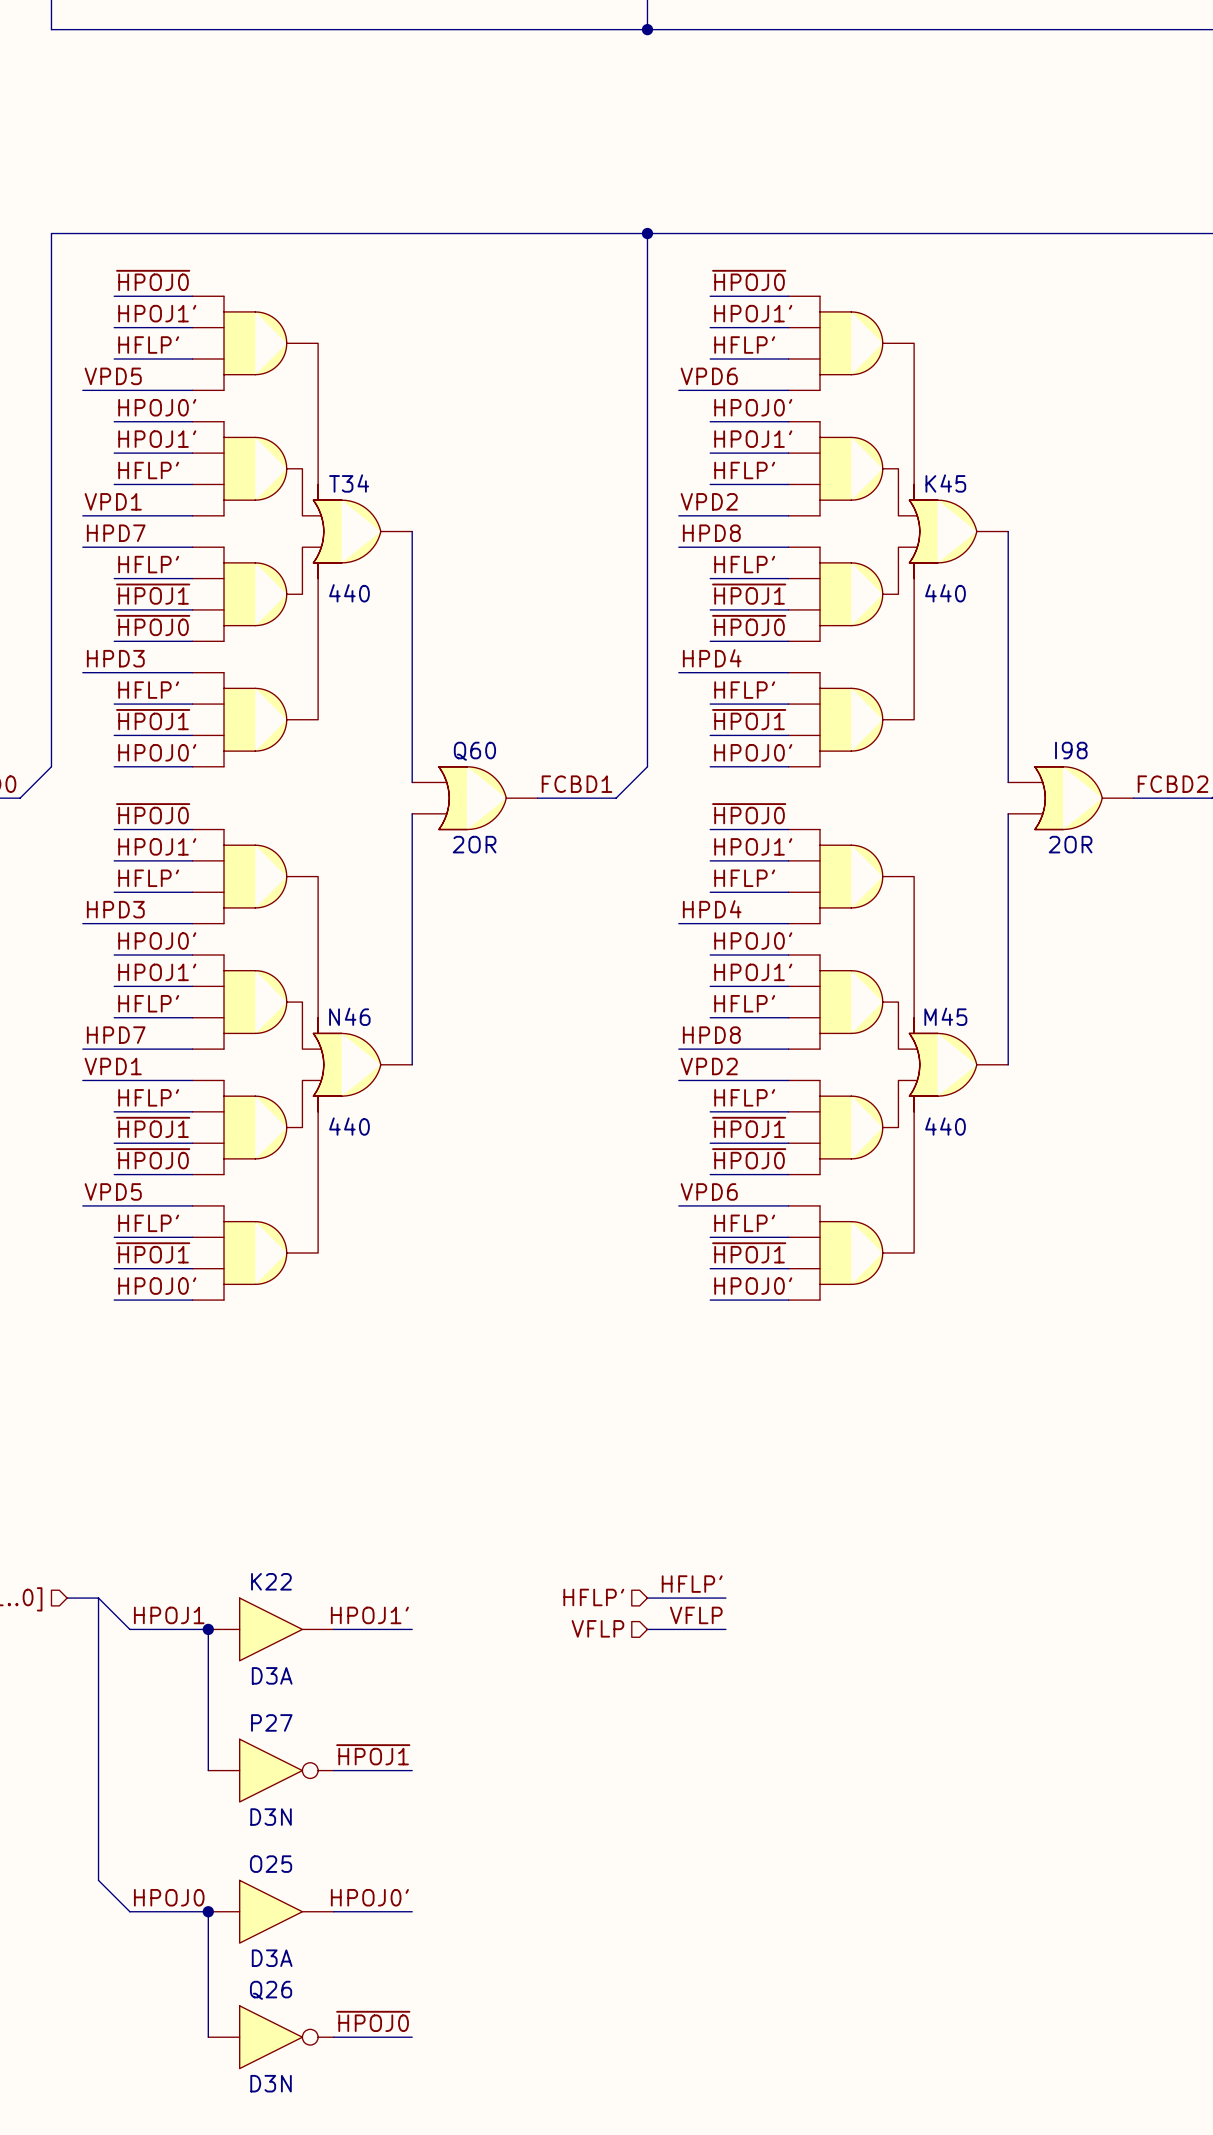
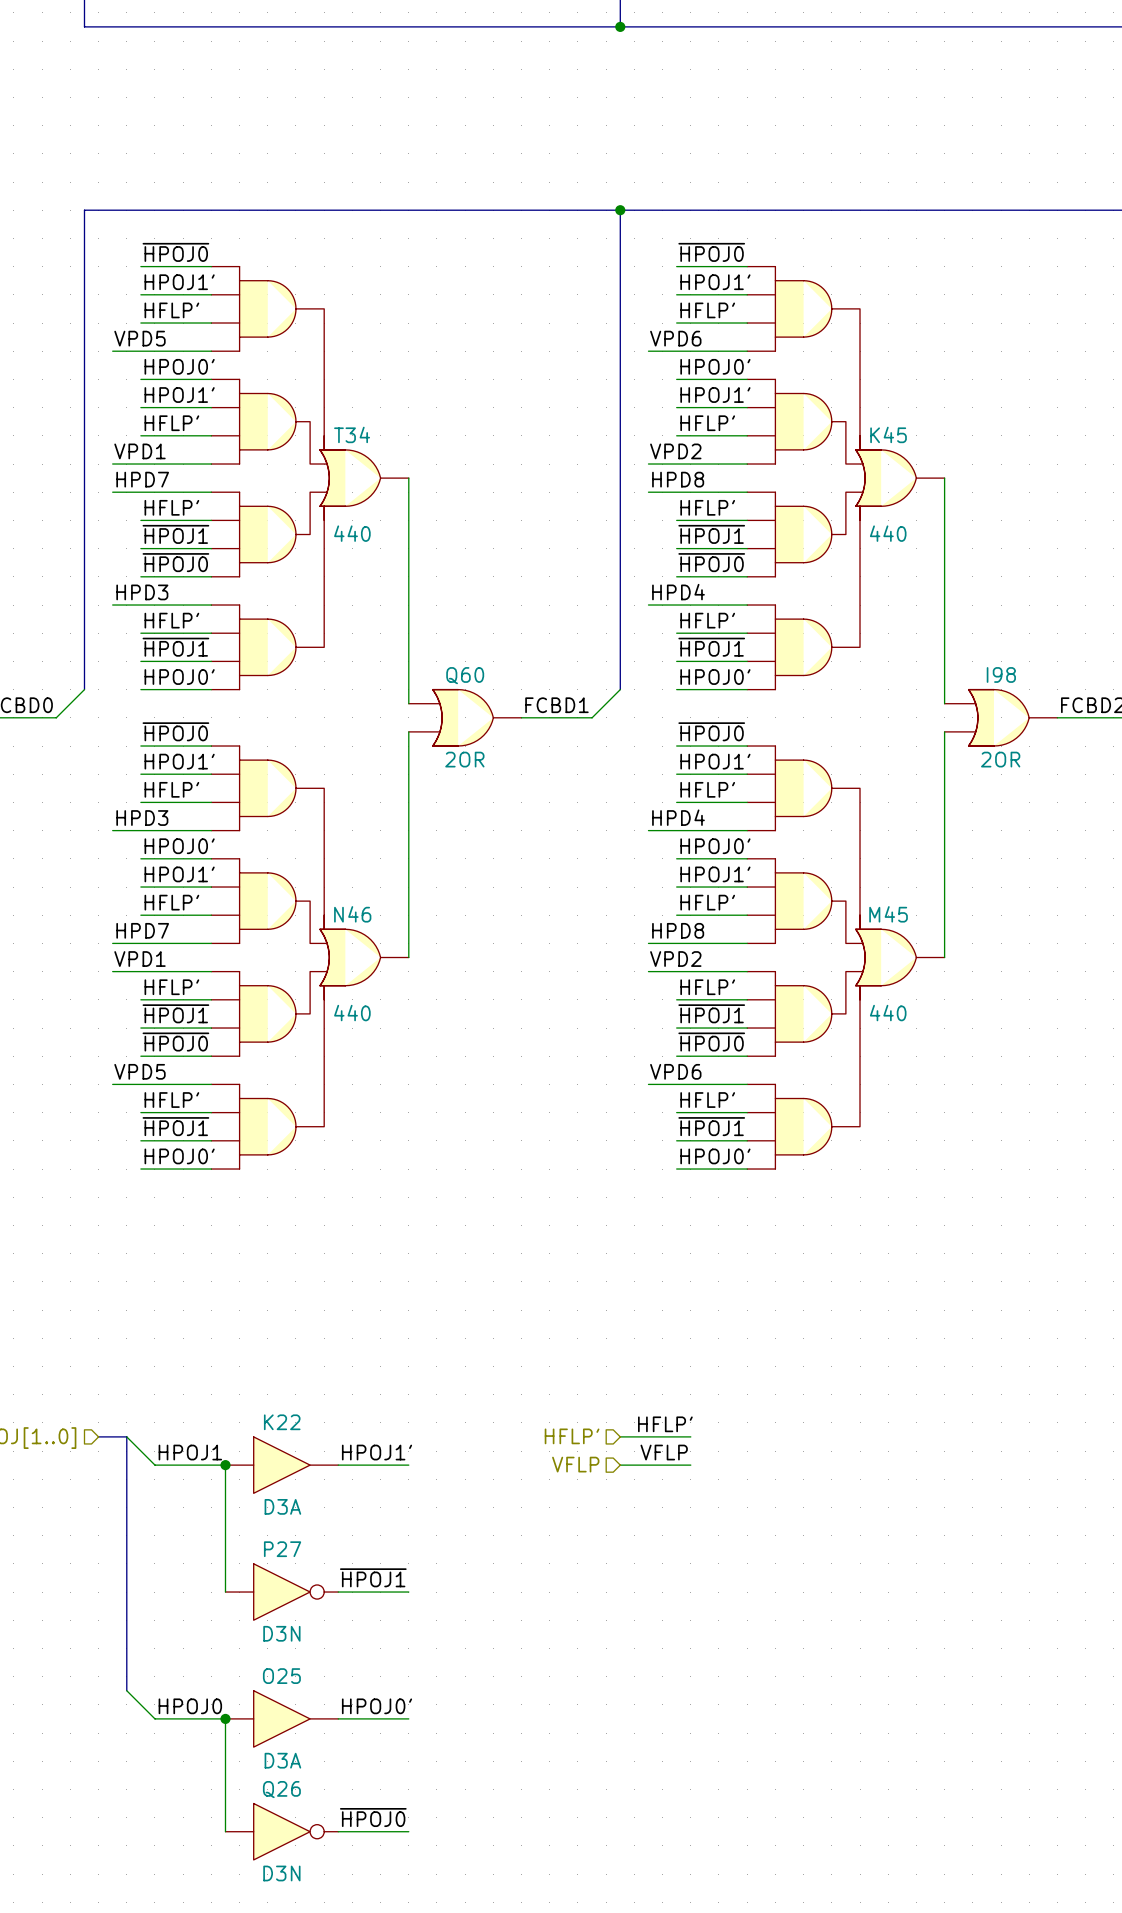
label position: HFLP' (692, 1584) -> HFLP' (665, 1424)
label position: HPOJ1' (369, 1615) -> HPOJ1' (377, 1452)
label position: ~{HPOJ1} (373, 1754) -> ~{HPOJ1} (373, 1577)
label position: HPOJ0' (369, 1897) -> HPOJ0' (377, 1706)
label position: ~{HPOJ0} (373, 2021) -> ~{HPOJ0} (373, 1817)

